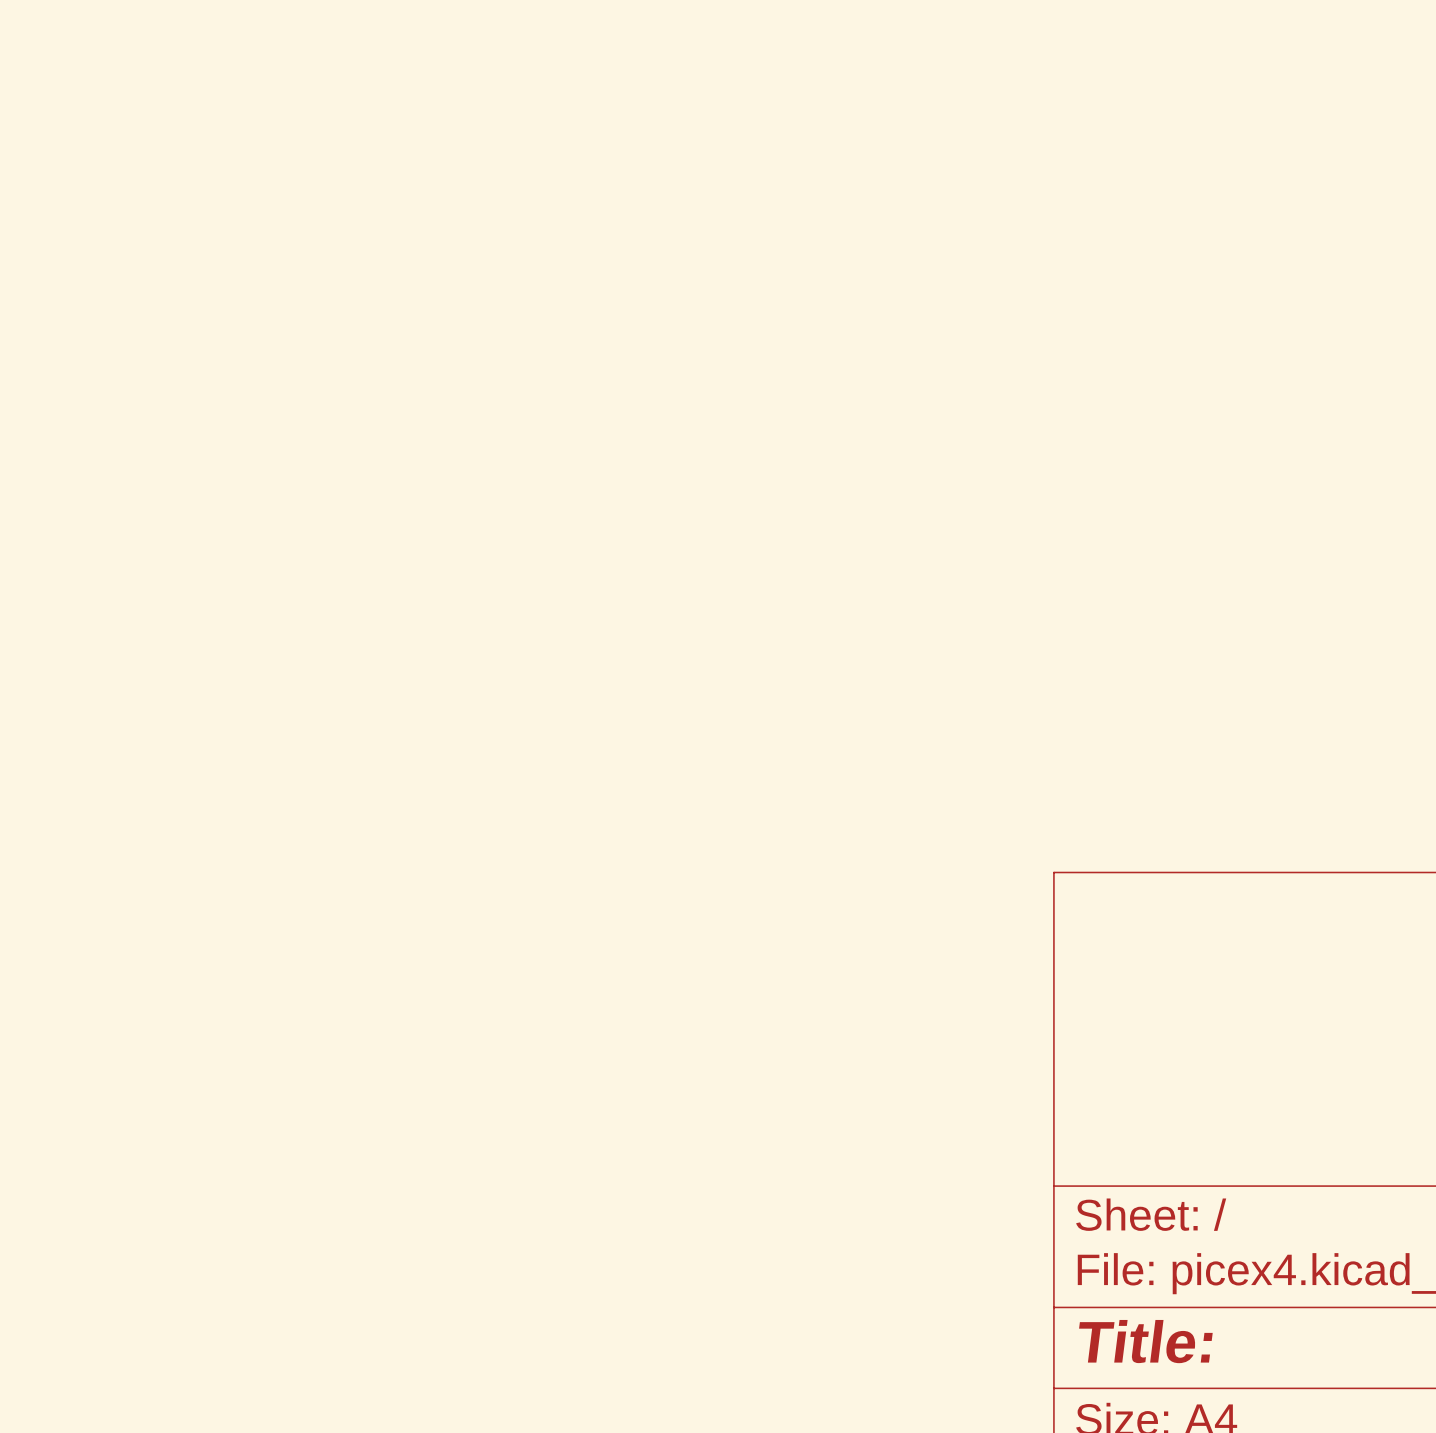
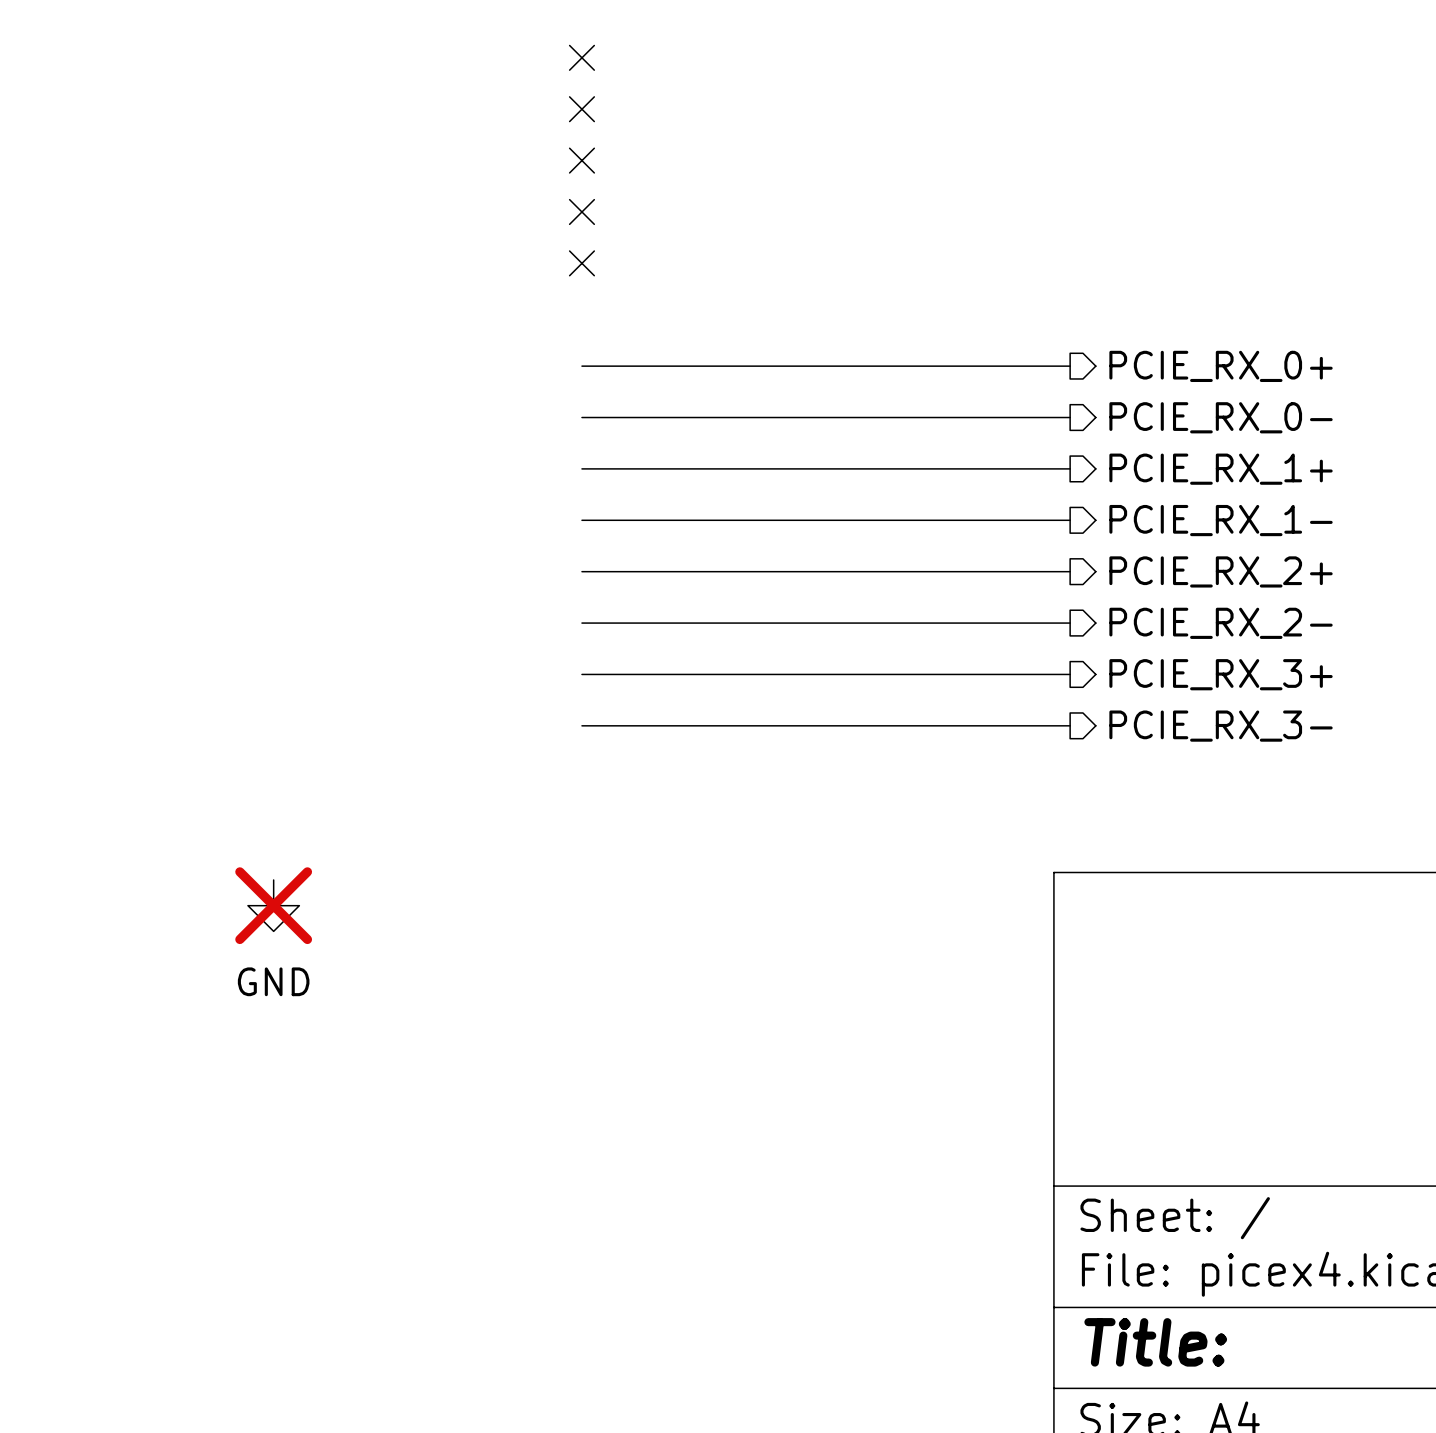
no-connect mark: none -> (581, 57)
no-connect mark: none -> (581, 109)
no-connect mark: none -> (581, 160)
no-connect mark: none -> (581, 211)
no-connect mark: none -> (581, 263)
wire: none -> (581, 366) (1070, 366)
hierarchical label: none -> PCIE_RX_0+ (1221, 366)
wire: none -> (581, 417) (1070, 417)
hierarchical label: none -> PCIE_RX_0- (1221, 417)
wire: none -> (581, 468) (1070, 468)
hierarchical label: none -> PCIE_RX_1+ (1221, 469)
wire: none -> (581, 520) (1070, 520)
hierarchical label: none -> PCIE_RX_1- (1221, 520)
wire: none -> (581, 571) (1070, 571)
hierarchical label: none -> PCIE_RX_2+ (1221, 571)
wire: none -> (581, 623) (1070, 623)
hierarchical label: none -> PCIE_RX_2- (1221, 623)
wire: none -> (581, 674) (1070, 674)
hierarchical label: none -> PCIE_RX_3+ (1221, 674)
wire: none -> (581, 725) (1070, 725)
hierarchical label: none -> PCIE_RX_3- (1221, 726)
power symbol: none -> GND (273, 905)

